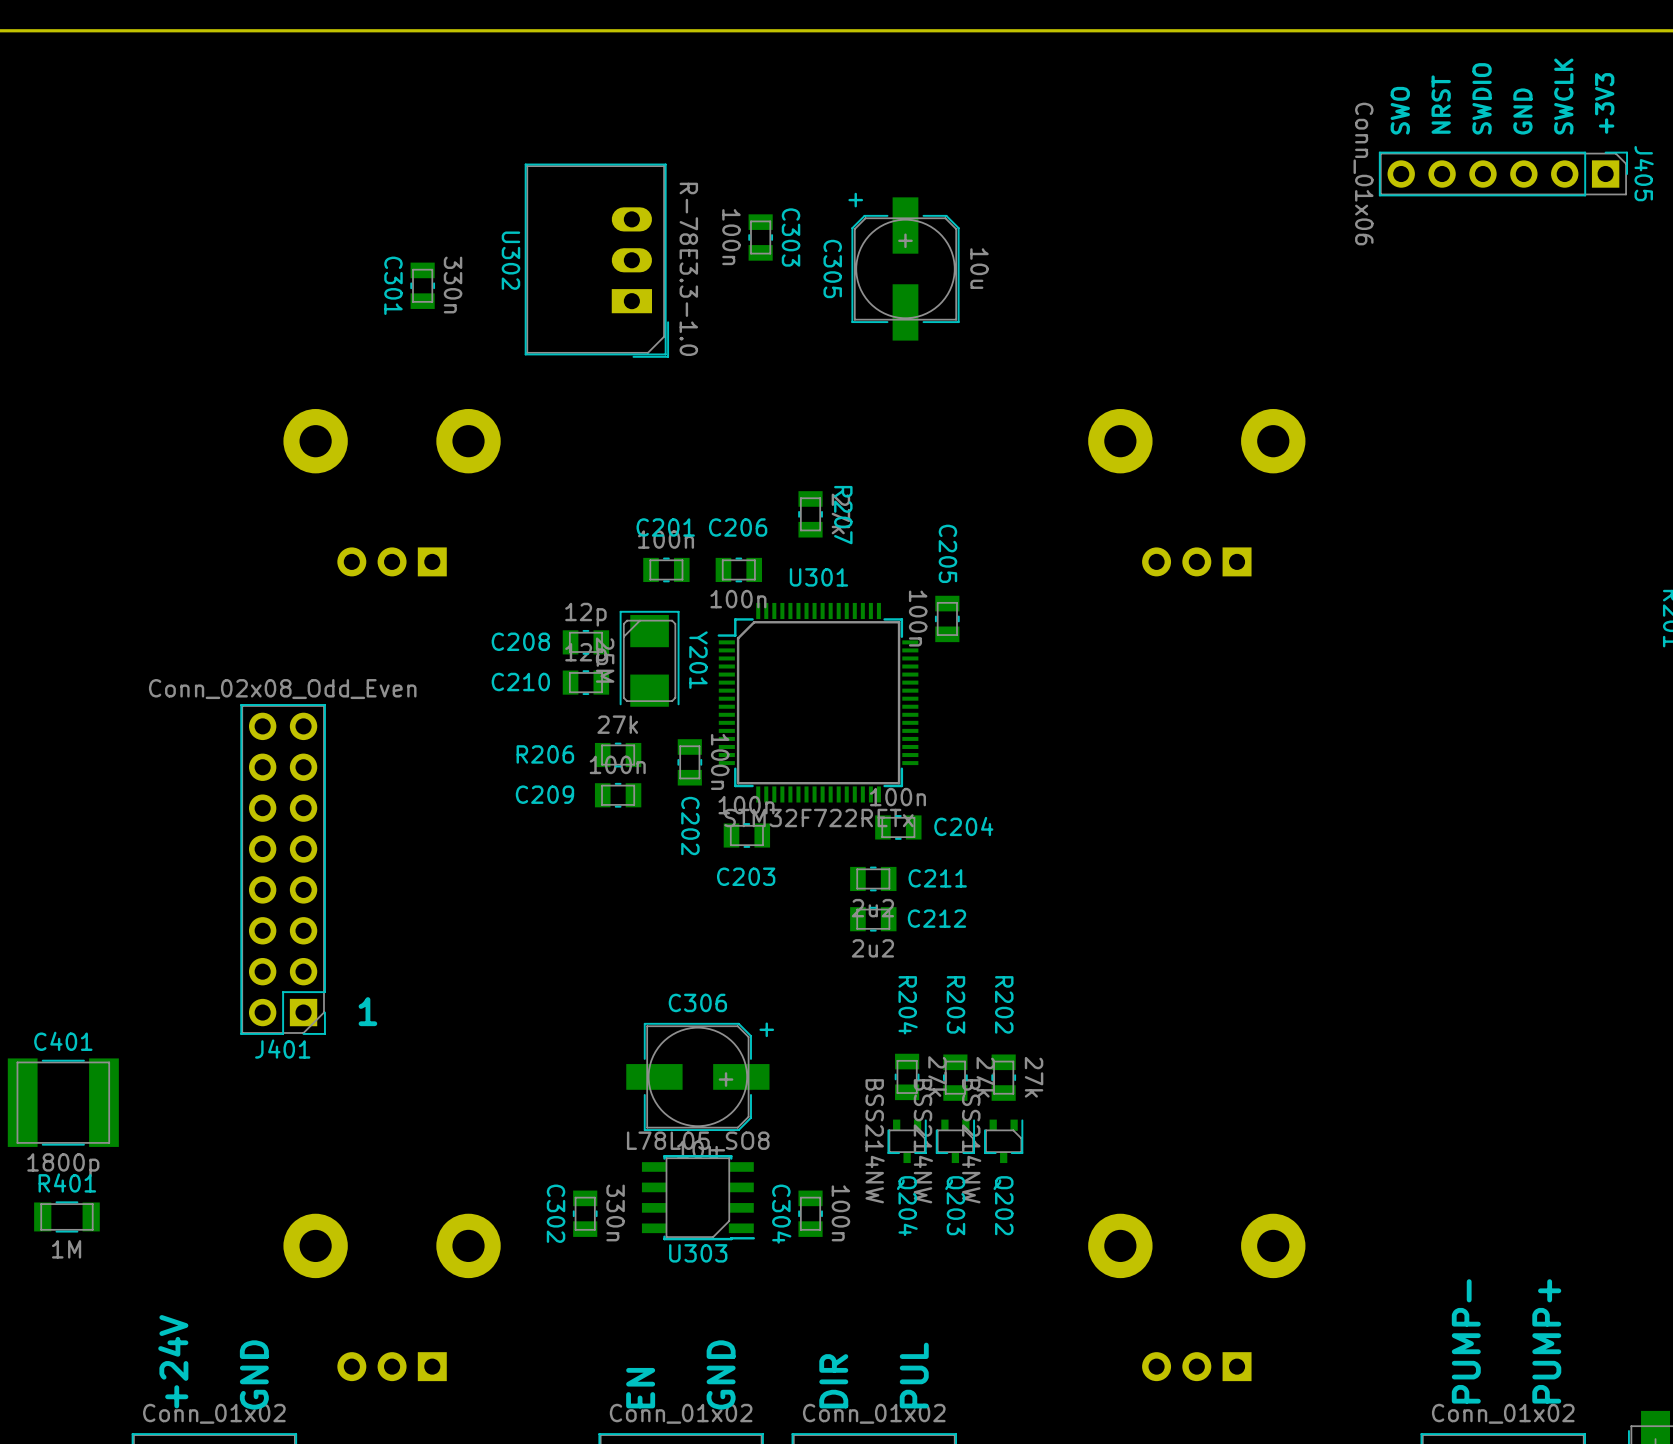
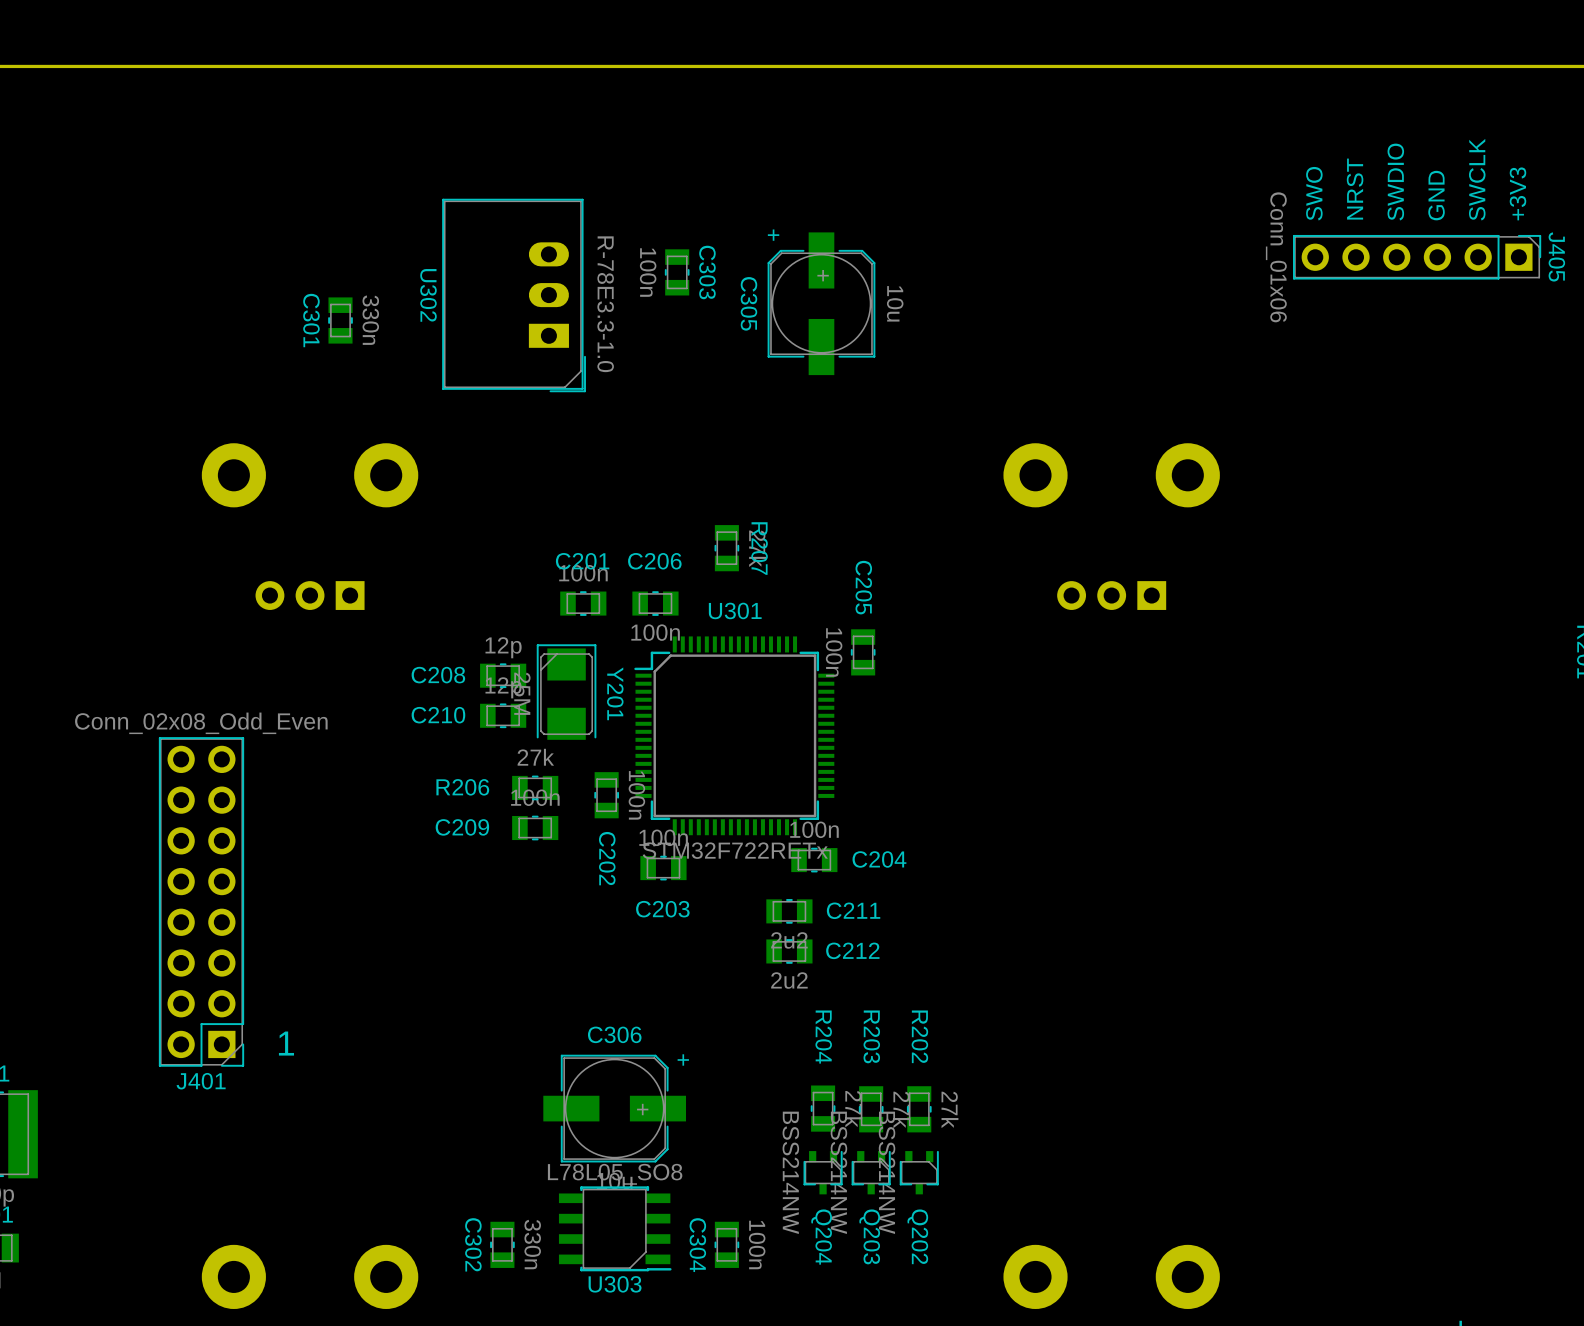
text position: SWCLK (1563, 96) -> SWCLK (1477, 179)
text position: SWDIO (1482, 98) -> SWDIO (1395, 182)
text position: +3V3 (1604, 103) -> +3V3 (1517, 193)
text position: NRST (1441, 104) -> NRST (1355, 189)
text position: SWO (1400, 110) -> SWO (1314, 193)
text position: GND (1522, 111) -> GND (1436, 195)
J405 position: (1503, 174) -> (1417, 257)

